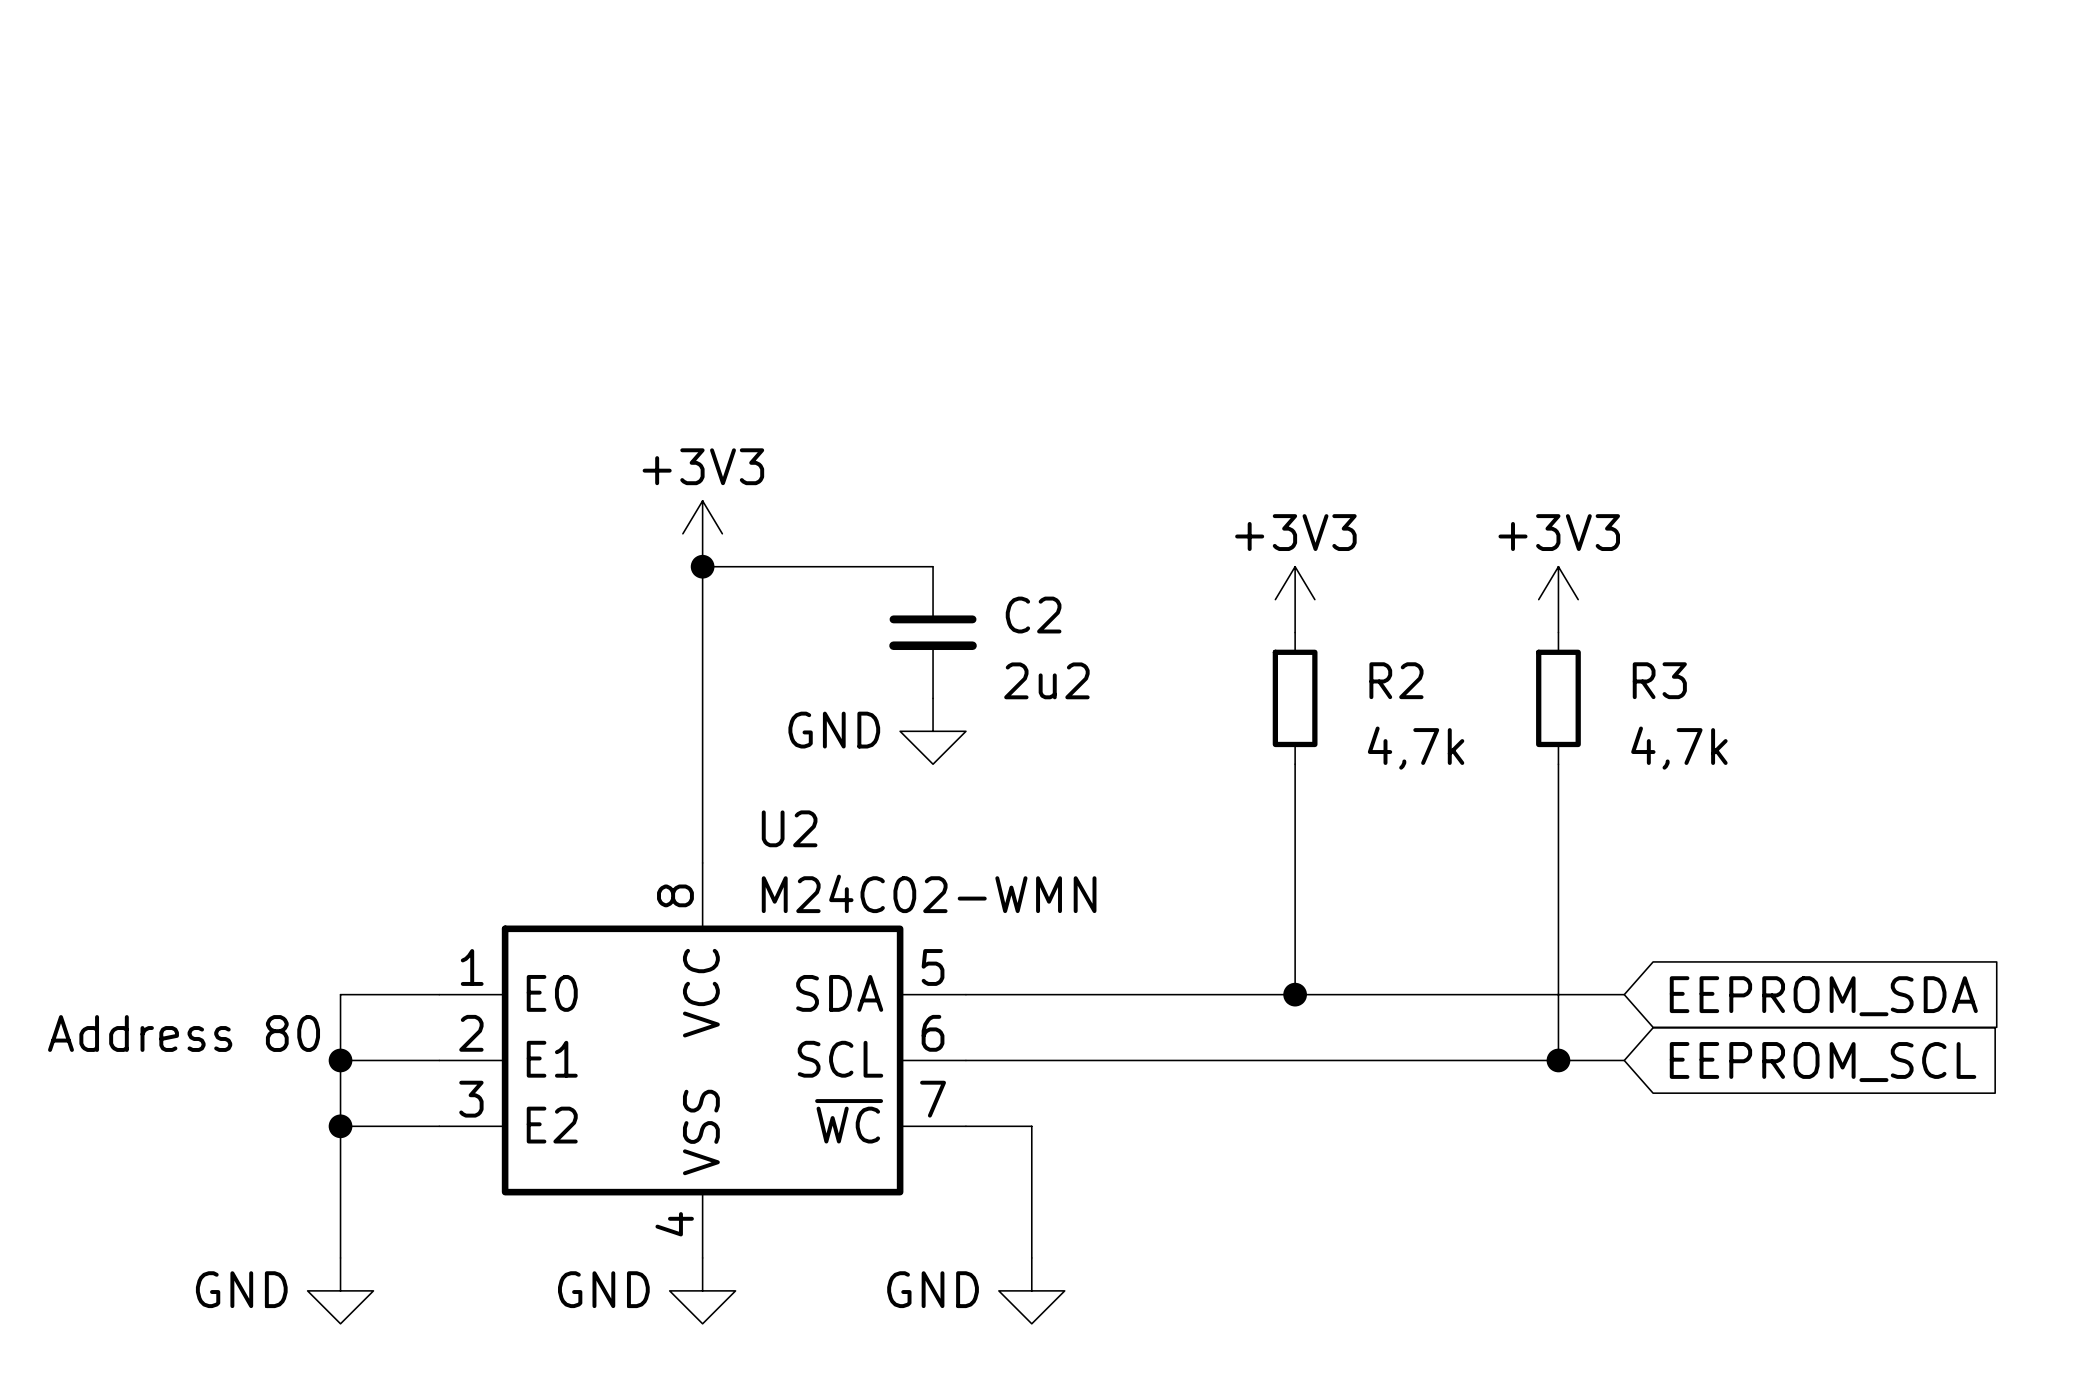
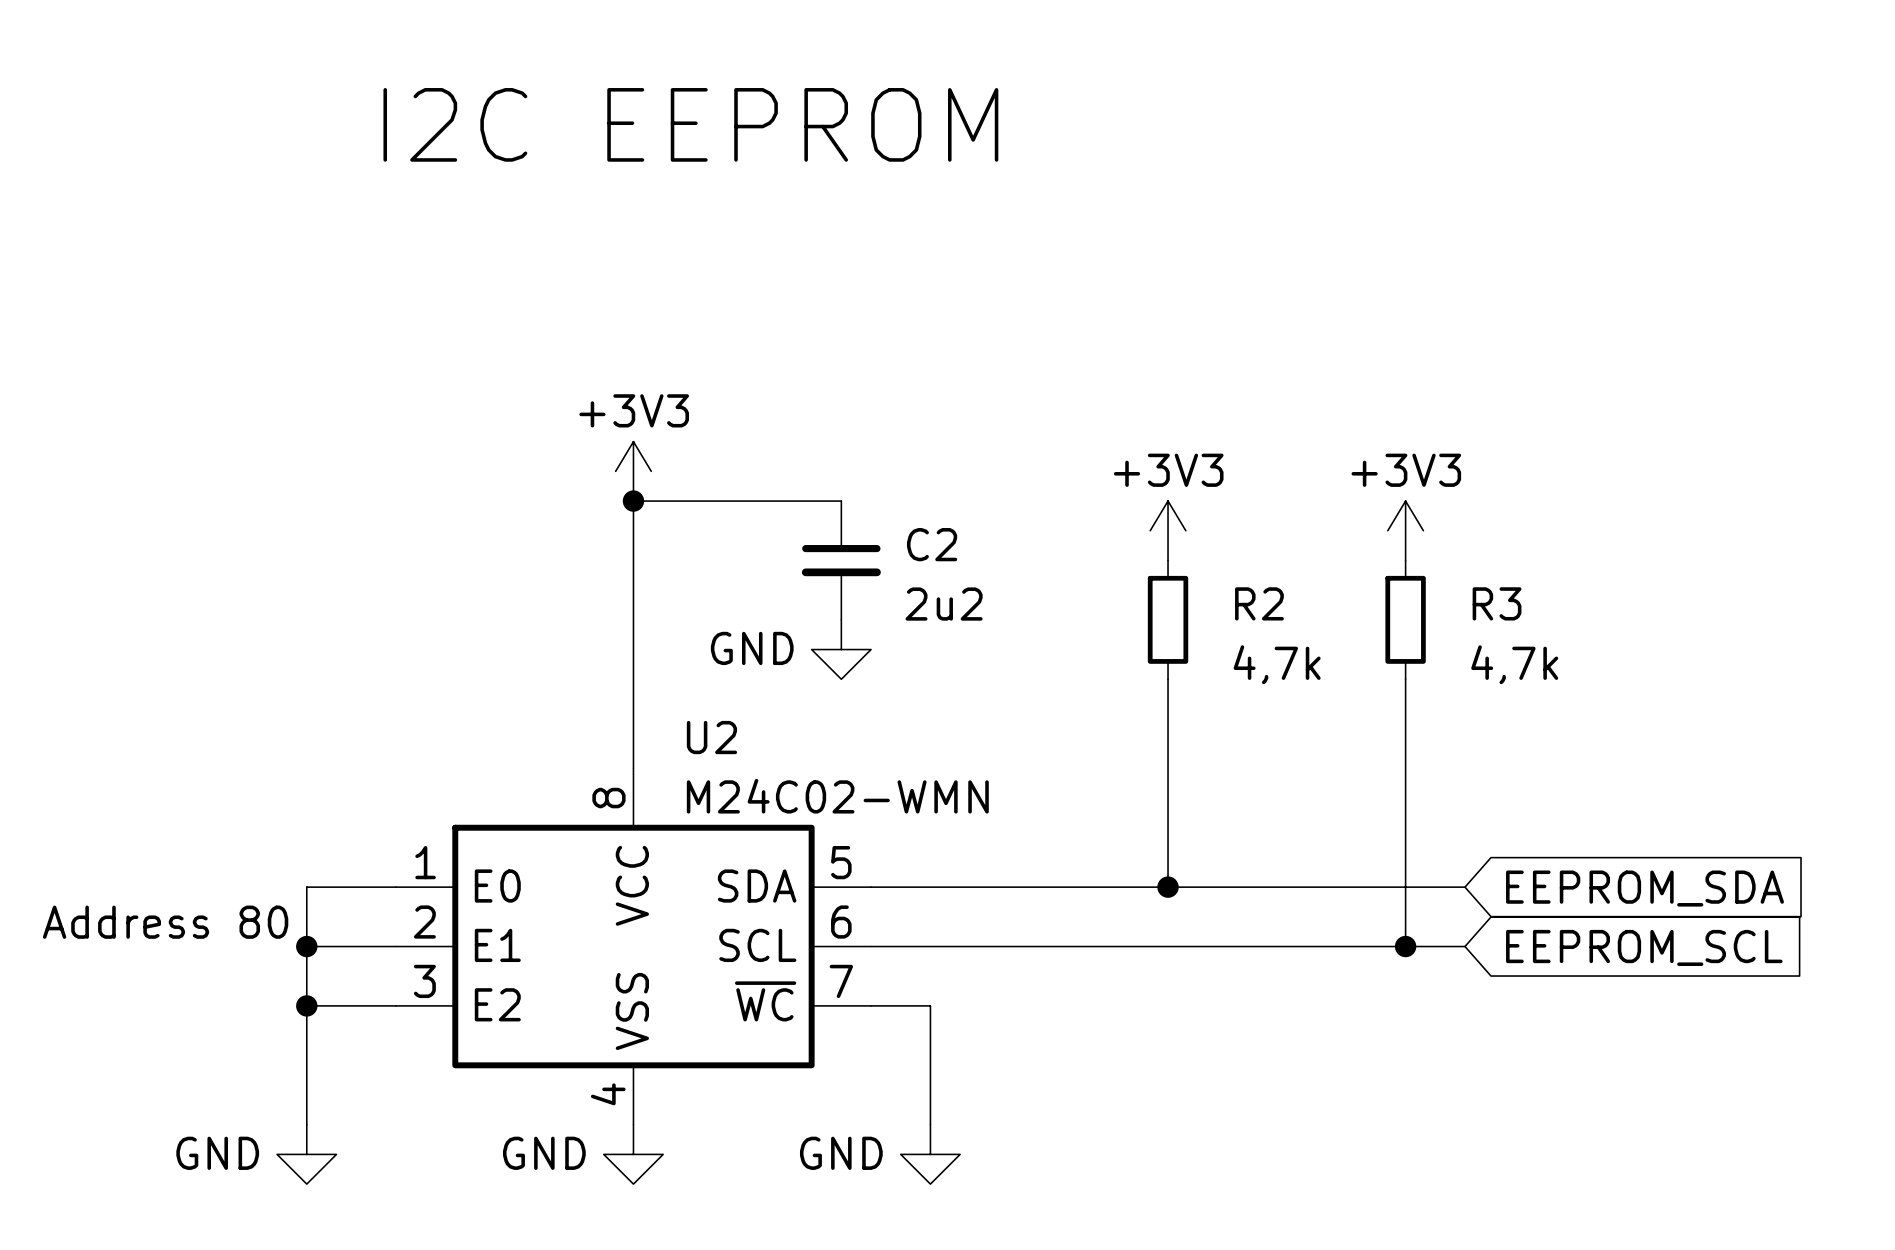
text: none -> I2C EEPROM (690, 124)

